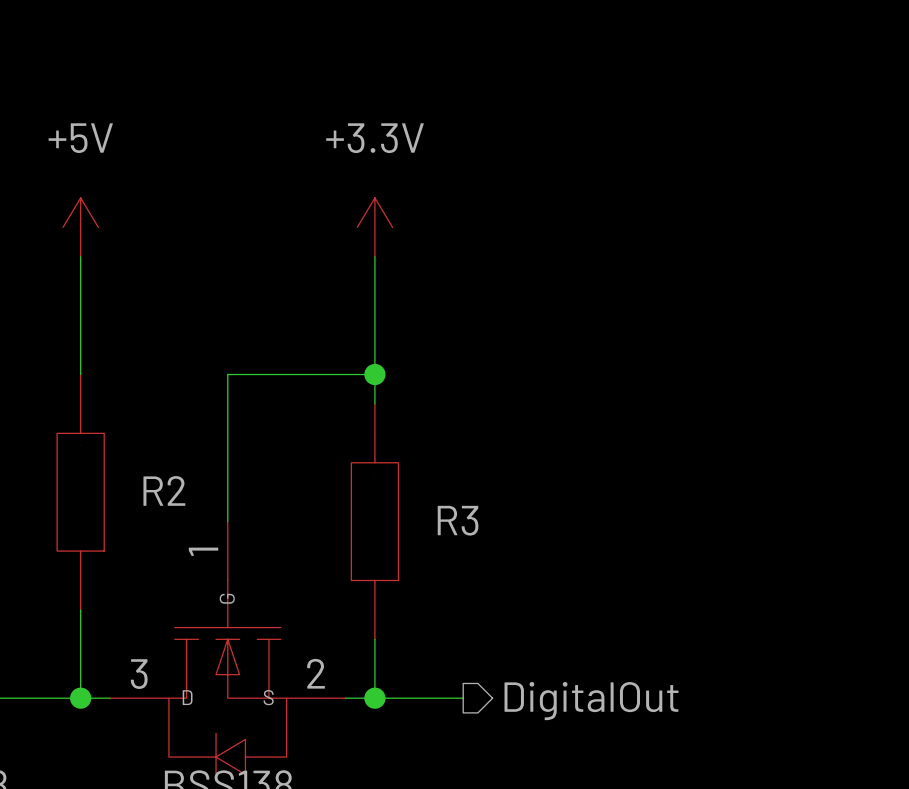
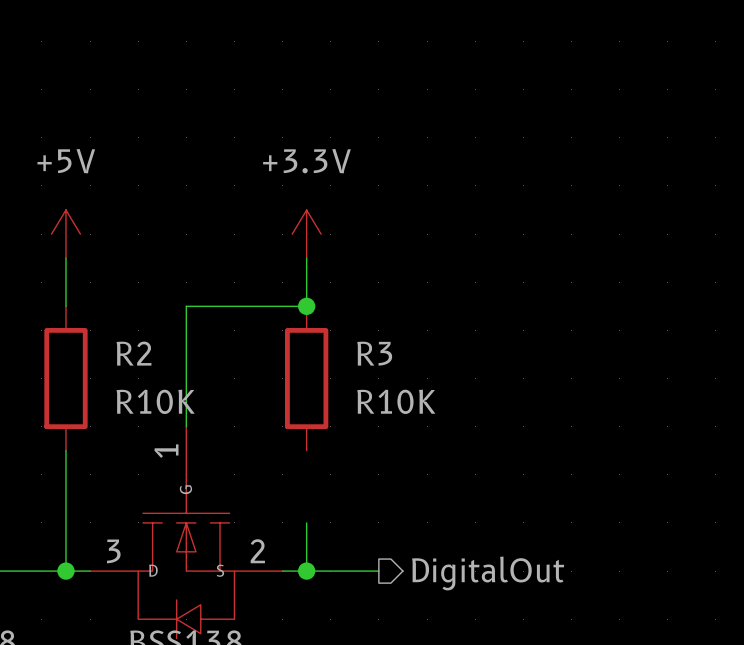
power symbol position: +5V (80, 227) -> +5V (65, 234)
power symbol position: +3.3V (374, 227) -> +3.3V (306, 234)
R2 symbol: [57, 374, 105, 610] -> [44, 306, 88, 451]
R3 symbol: [351, 403, 399, 640] -> [285, 306, 329, 451]
R2 value: none -> R10K (155, 401)
R3 value: none -> R10K (396, 401)

